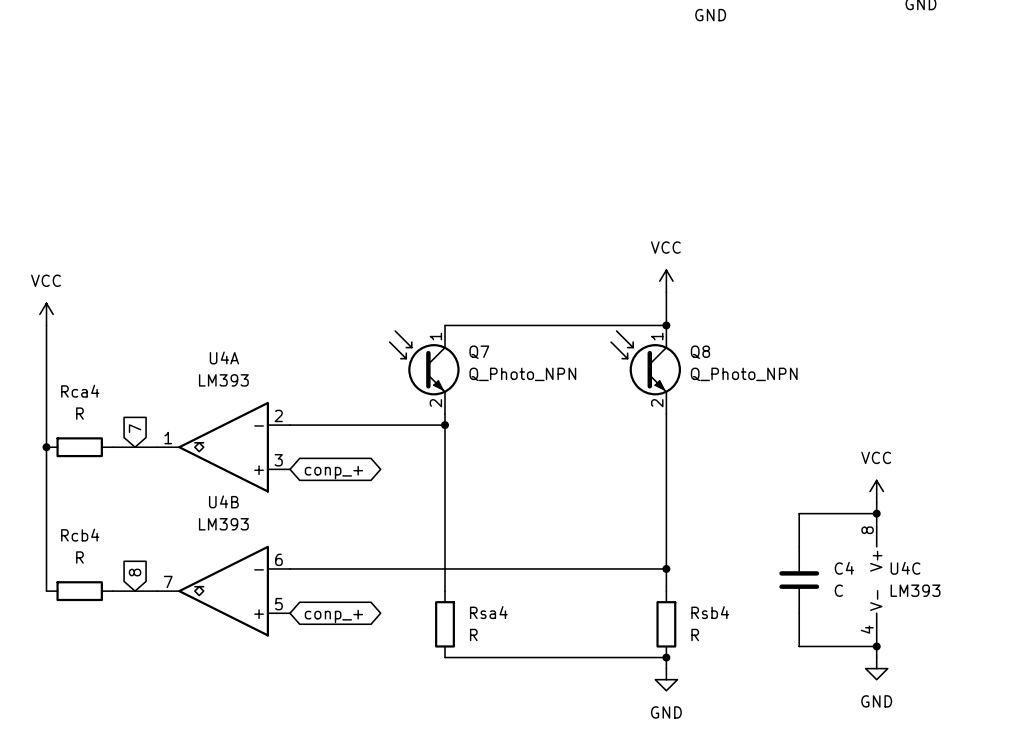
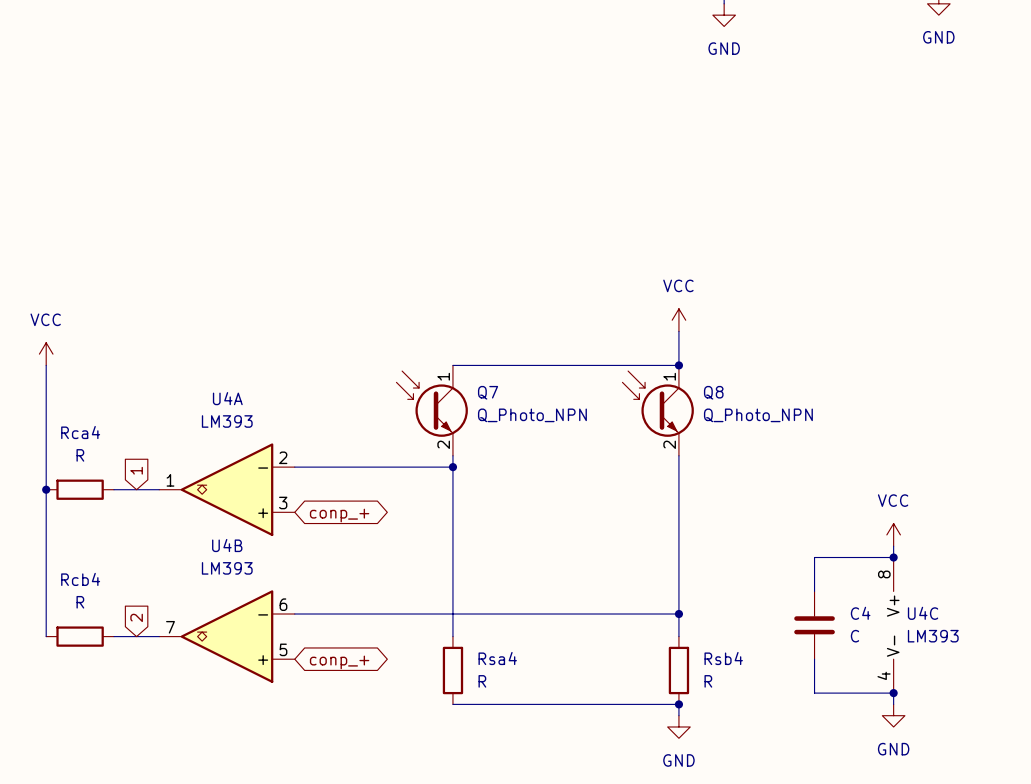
global label: 7 (135, 428) -> 1 (136, 470)
global label: 8 (135, 572) -> 2 (136, 617)

